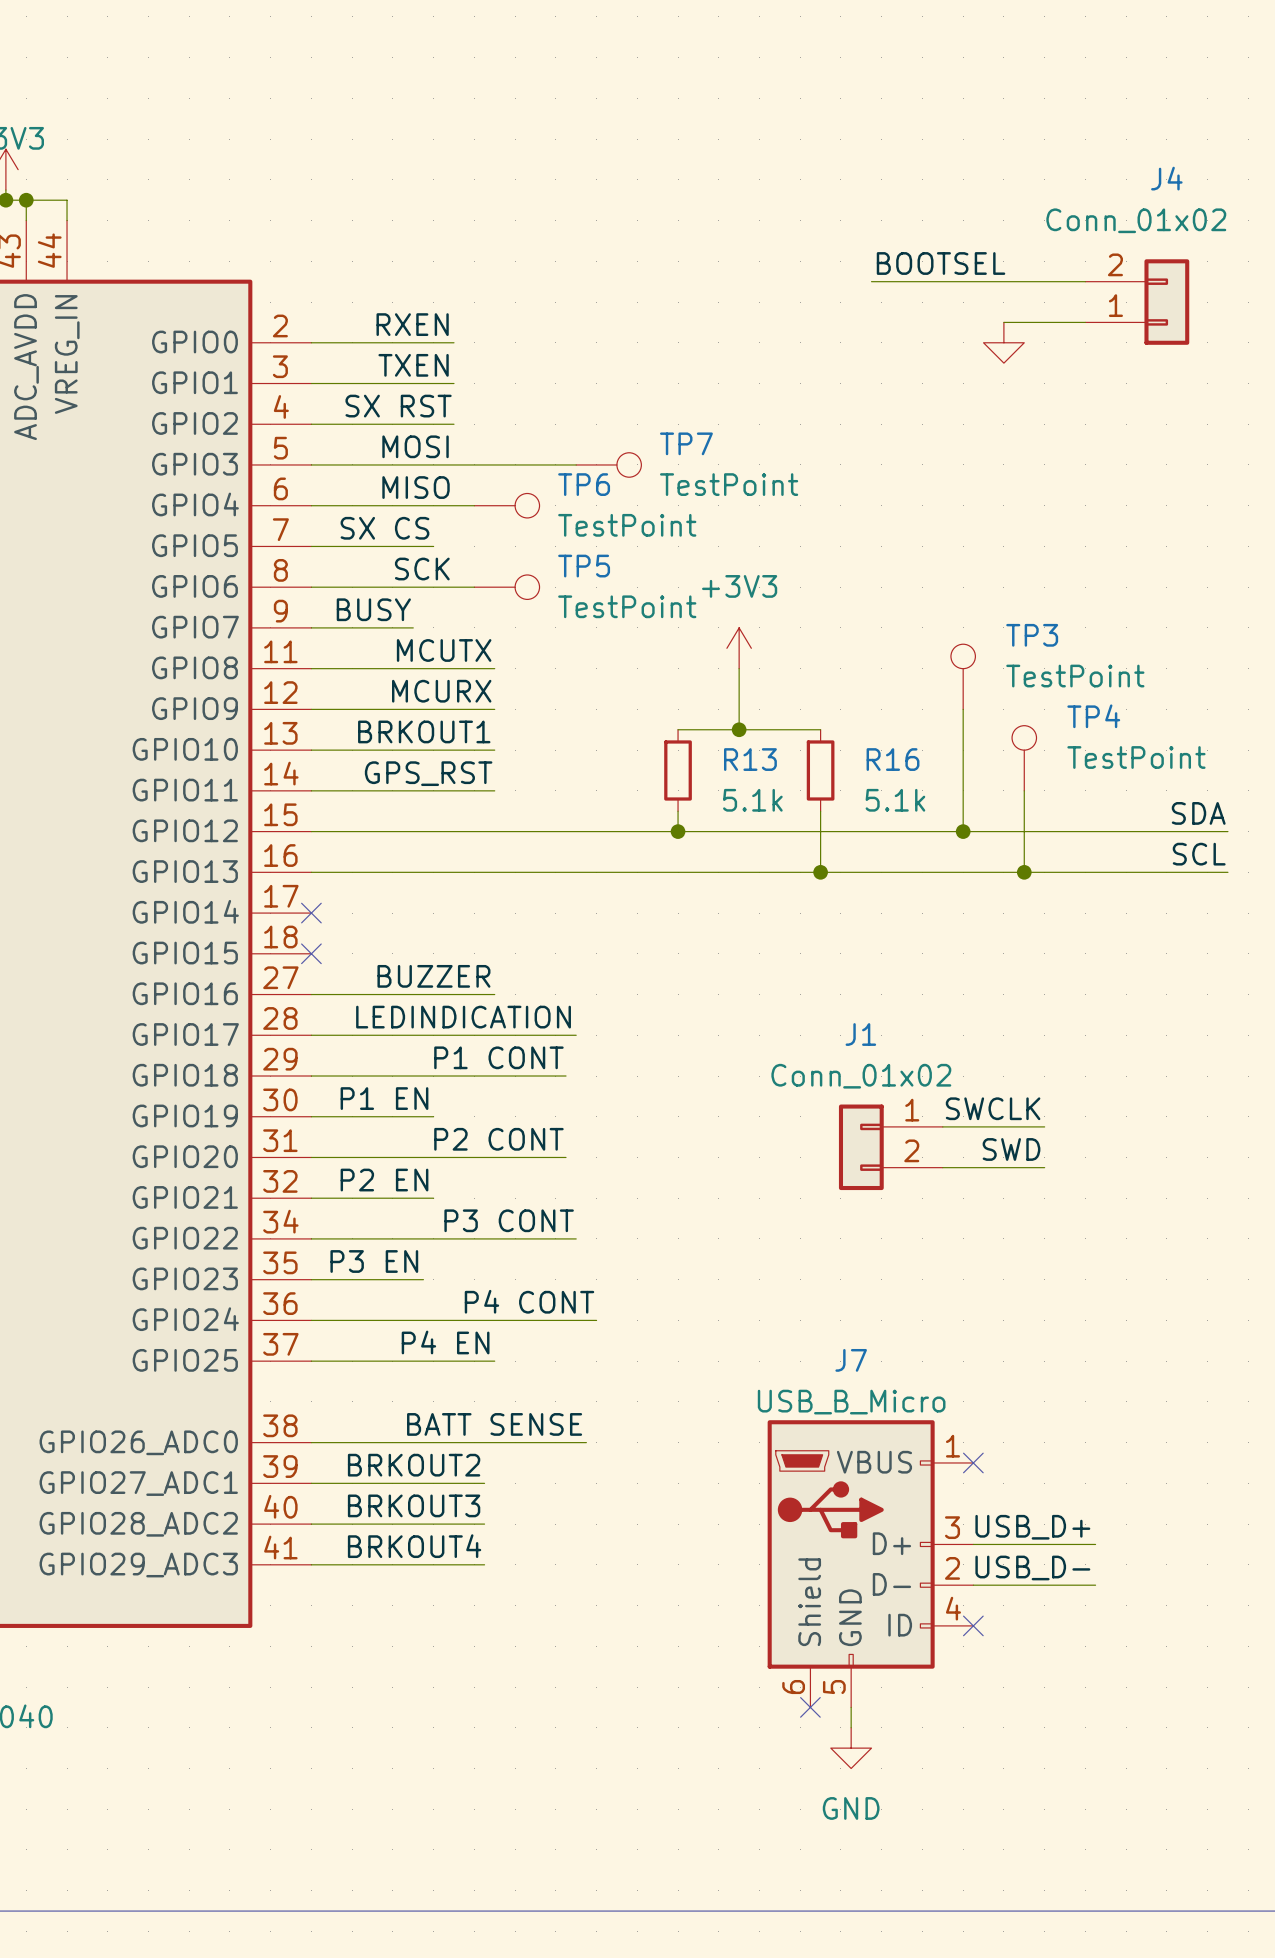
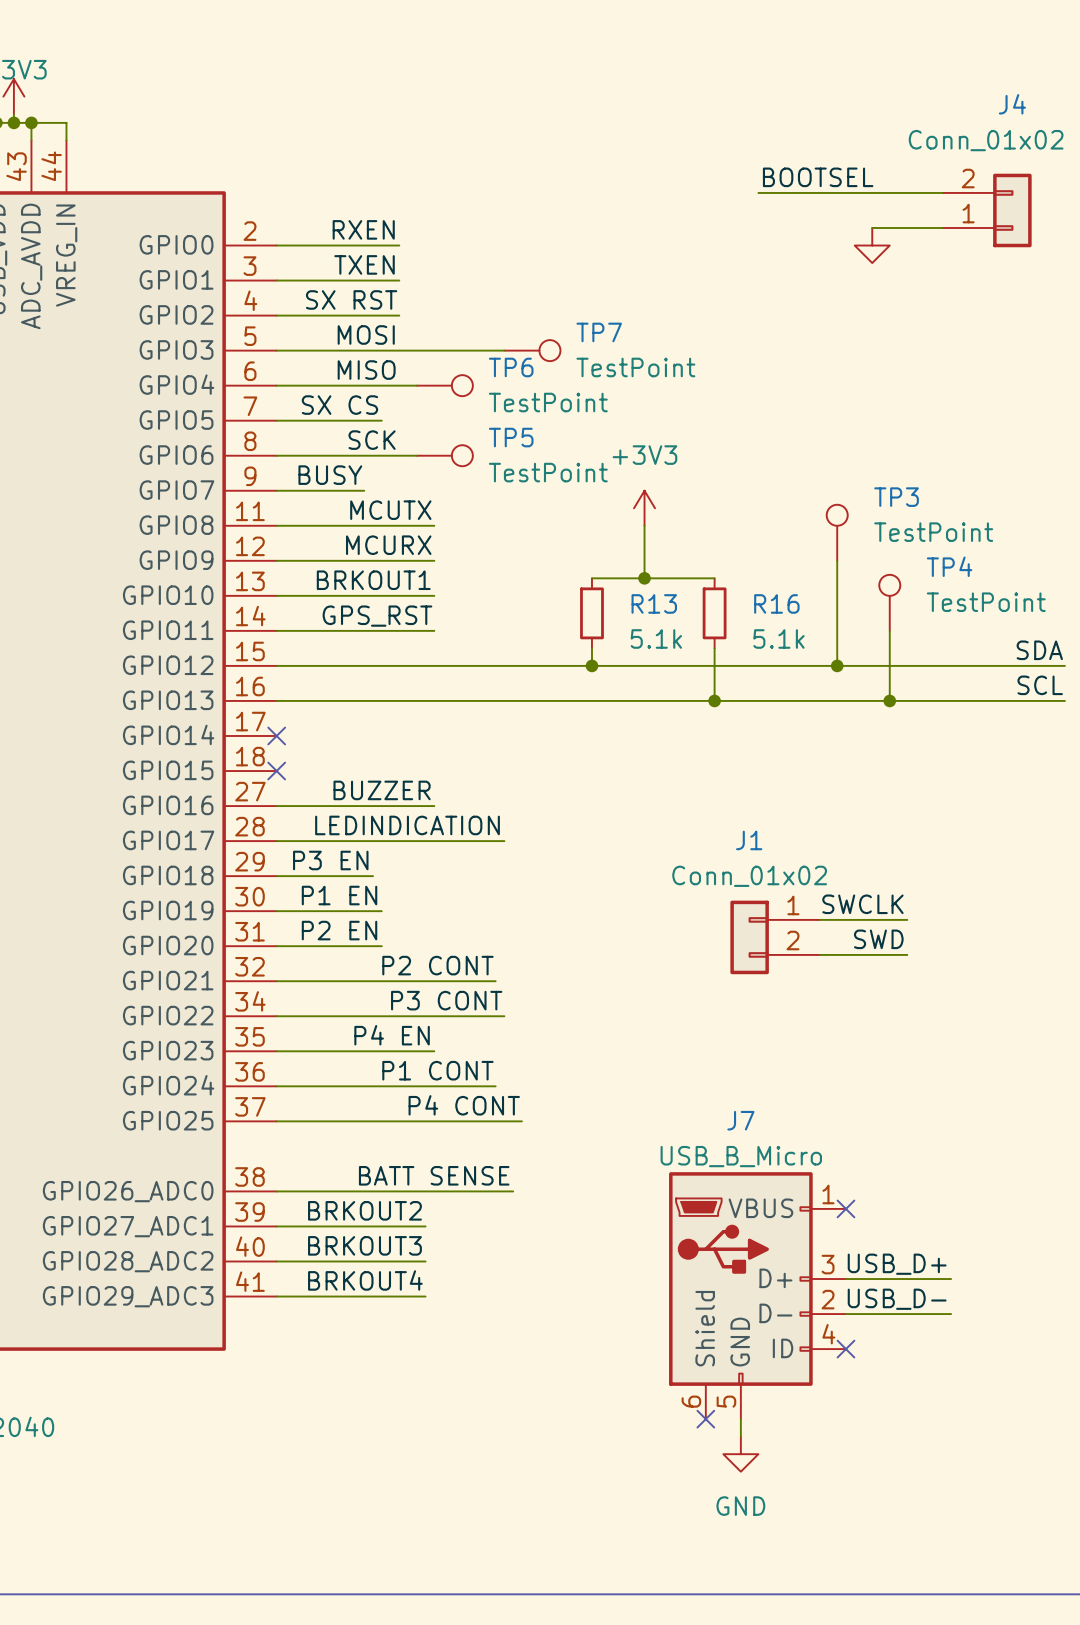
label position: P1 CONT (498, 1057) -> P1 CONT (437, 1070)
wire: (423, 1076) (566, 1076) -> none
label position: P2 CONT (498, 1139) -> P2 CONT (437, 965)
wire: (433, 1157) (566, 1157) -> (381, 981) (495, 981)
label position: P2 EN (384, 1180) -> P2 EN (339, 930)
label position: P3 EN (374, 1261) -> P3 EN (330, 860)
wire: none -> (373, 1051) (434, 1051)
label position: P4 CONT (529, 1301) -> P4 CONT (464, 1105)
wire: (566, 1320) (596, 1320) -> none
label position: P4 EN (445, 1342) -> P4 EN (392, 1035)
wire: none -> (434, 1121) (521, 1121)

